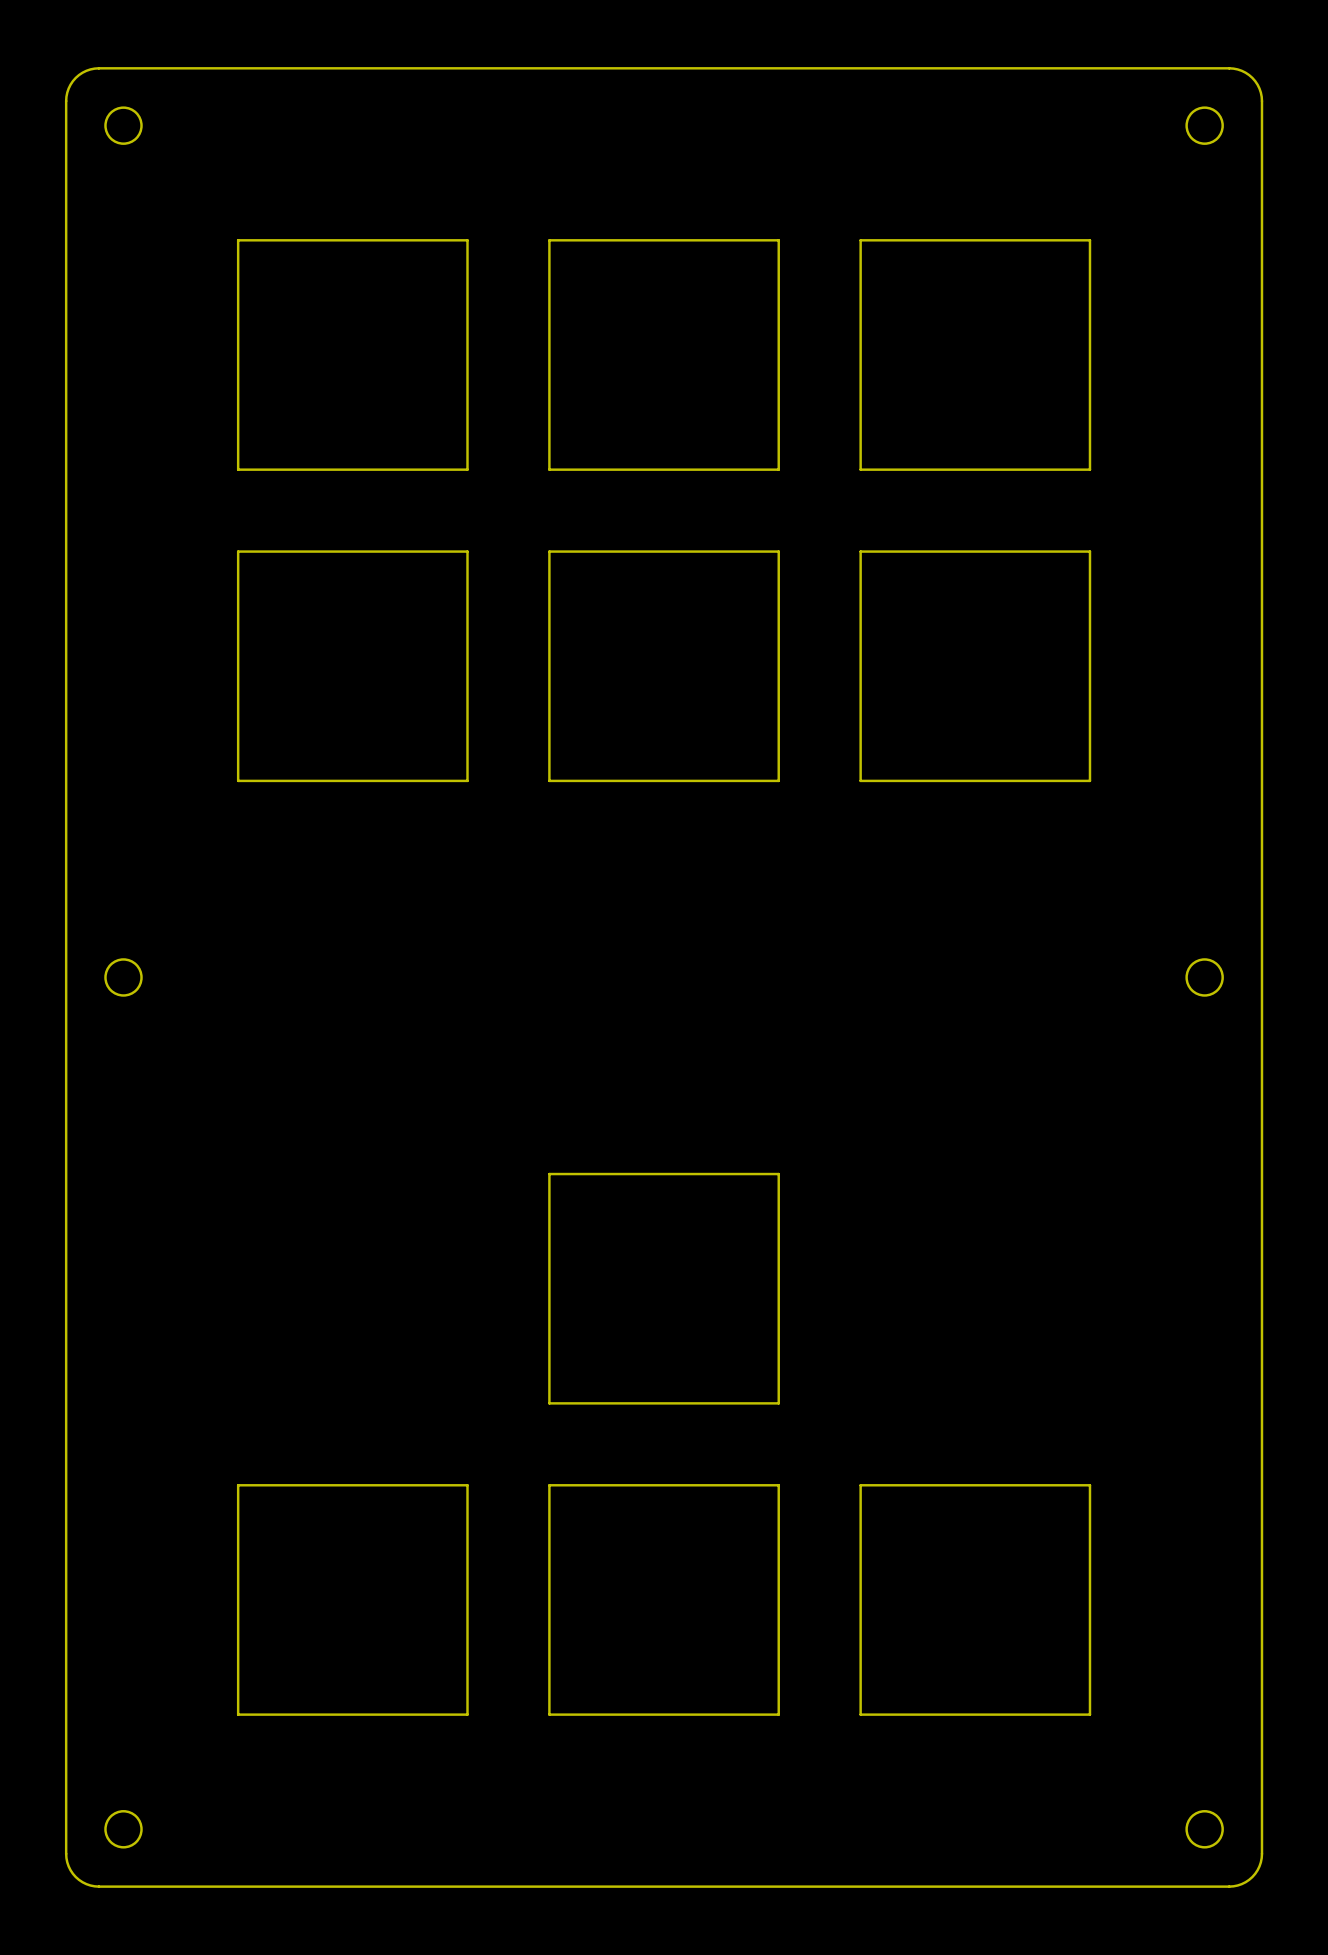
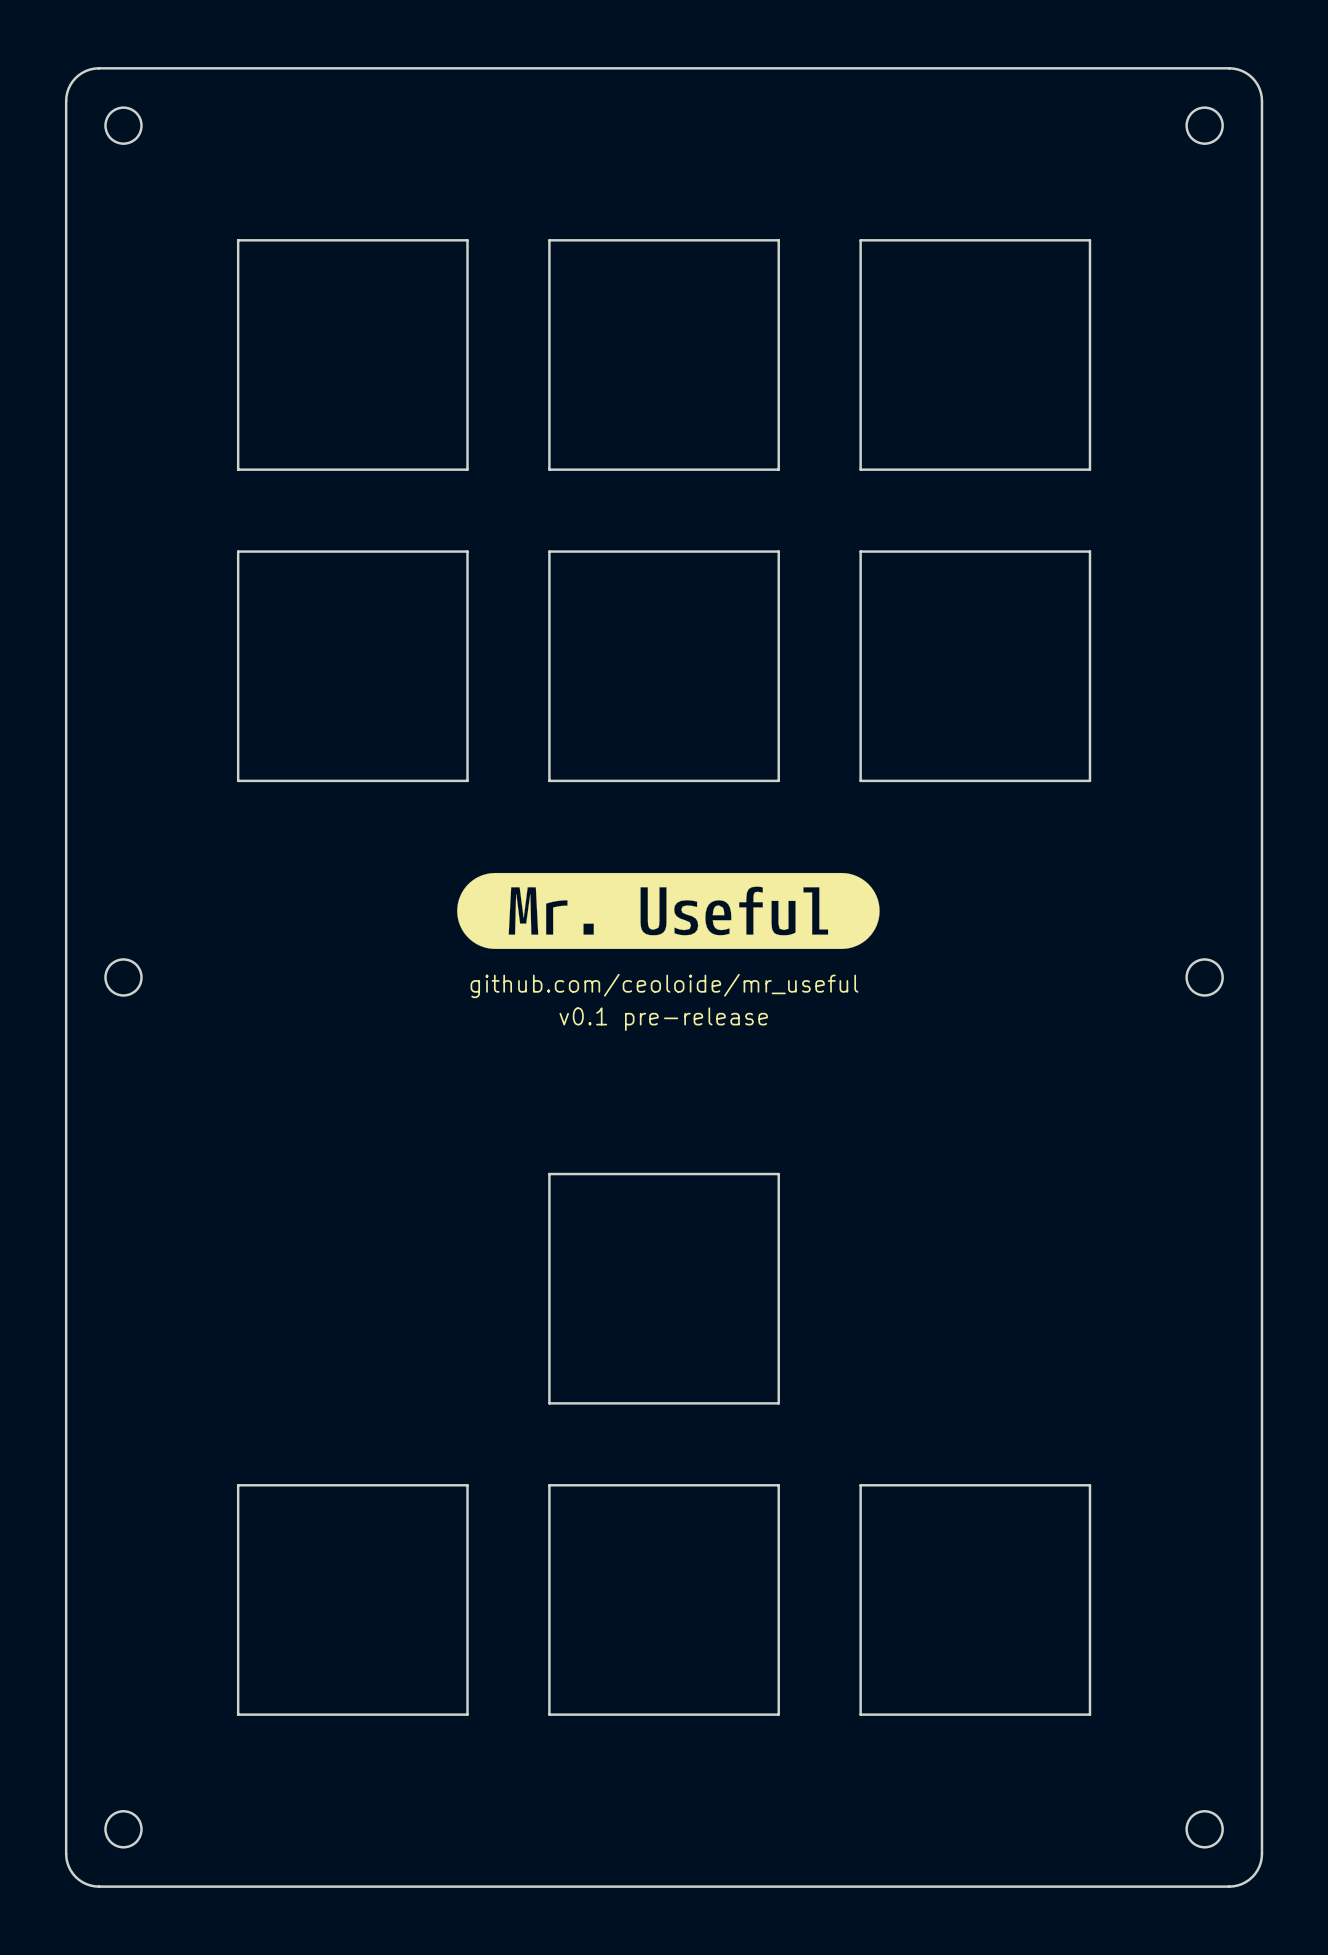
drawing: none -> [457, 872, 880, 949]

